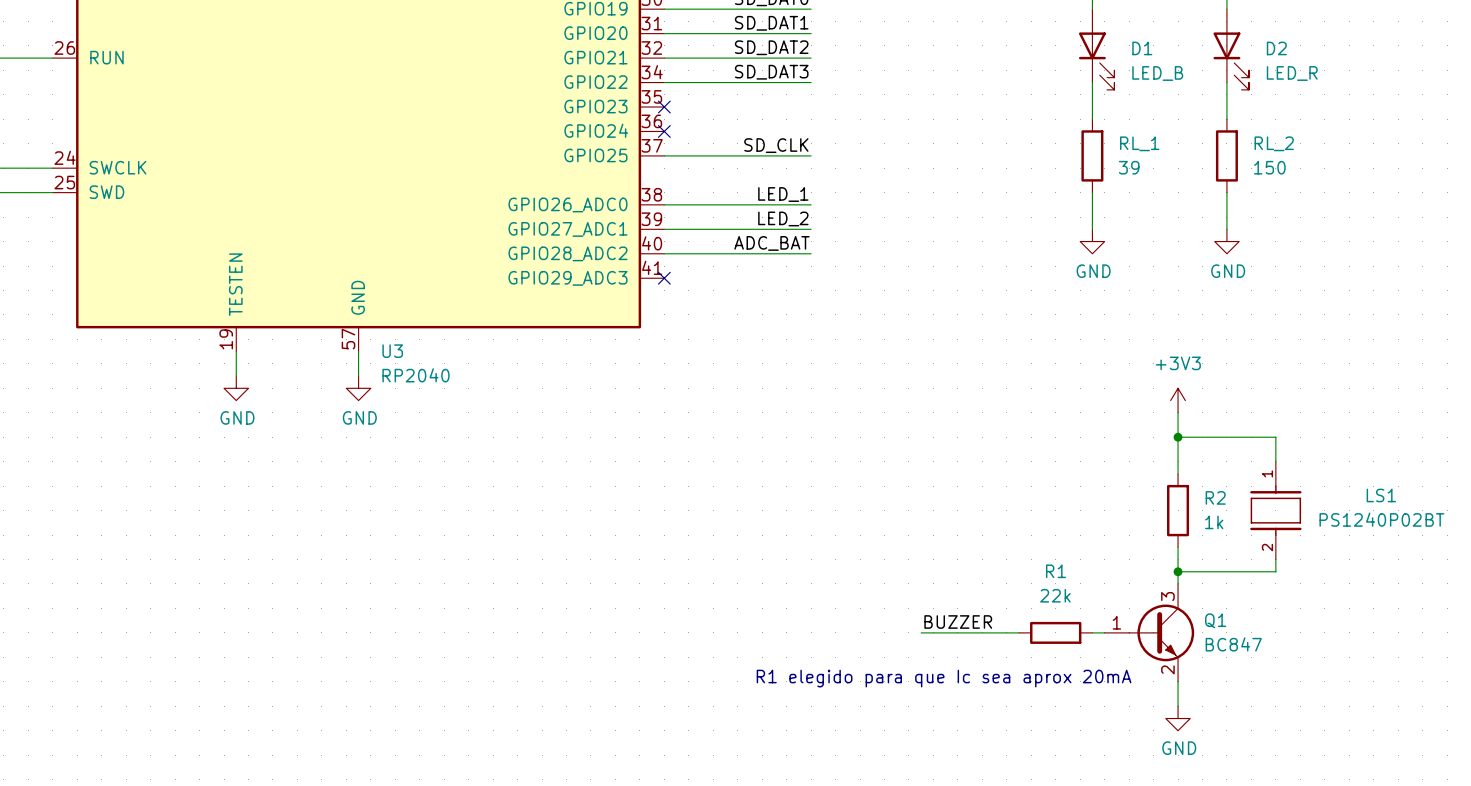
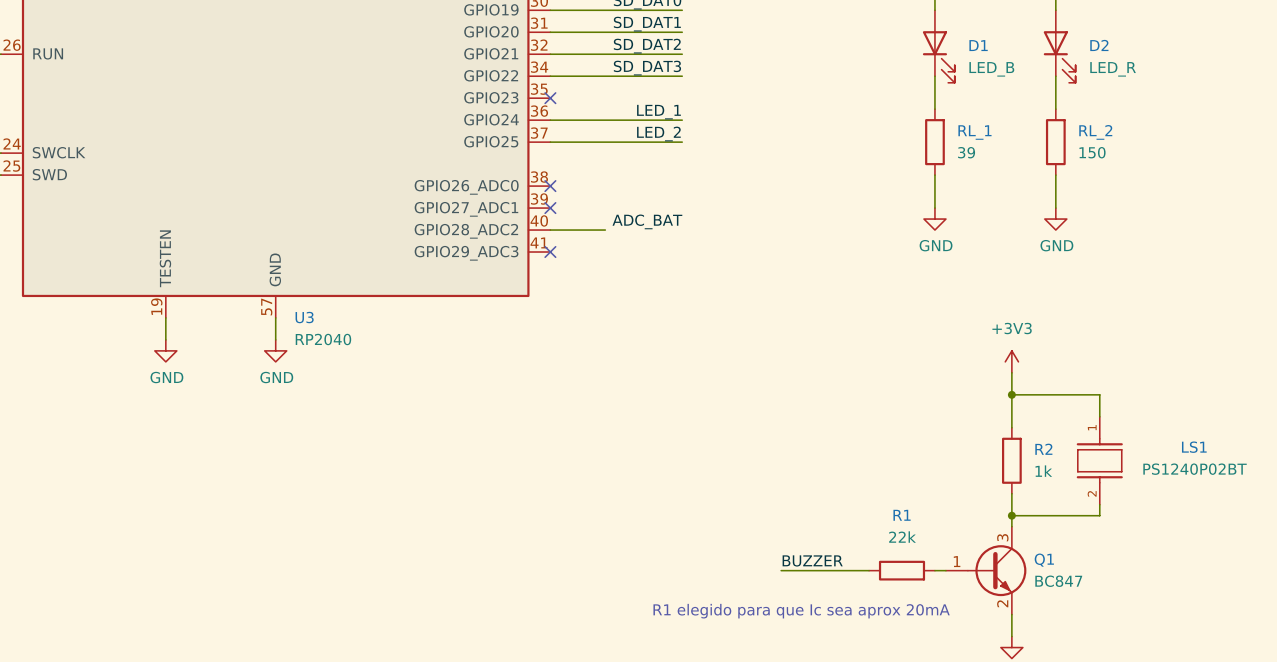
no-connect mark: (664, 131) -> none
label: SD_CLK (776, 145) -> LED_2 (658, 134)
label position: LED_1 (783, 194) -> LED_1 (658, 112)
wire: (664, 204) (811, 204) -> (550, 120) (682, 120)
no-connect mark: none -> (550, 186)
label: LED_2 (783, 218) -> none
wire: (664, 229) (811, 229) -> none
no-connect mark: none -> (550, 208)
wire: (725, 253) (811, 253) -> none

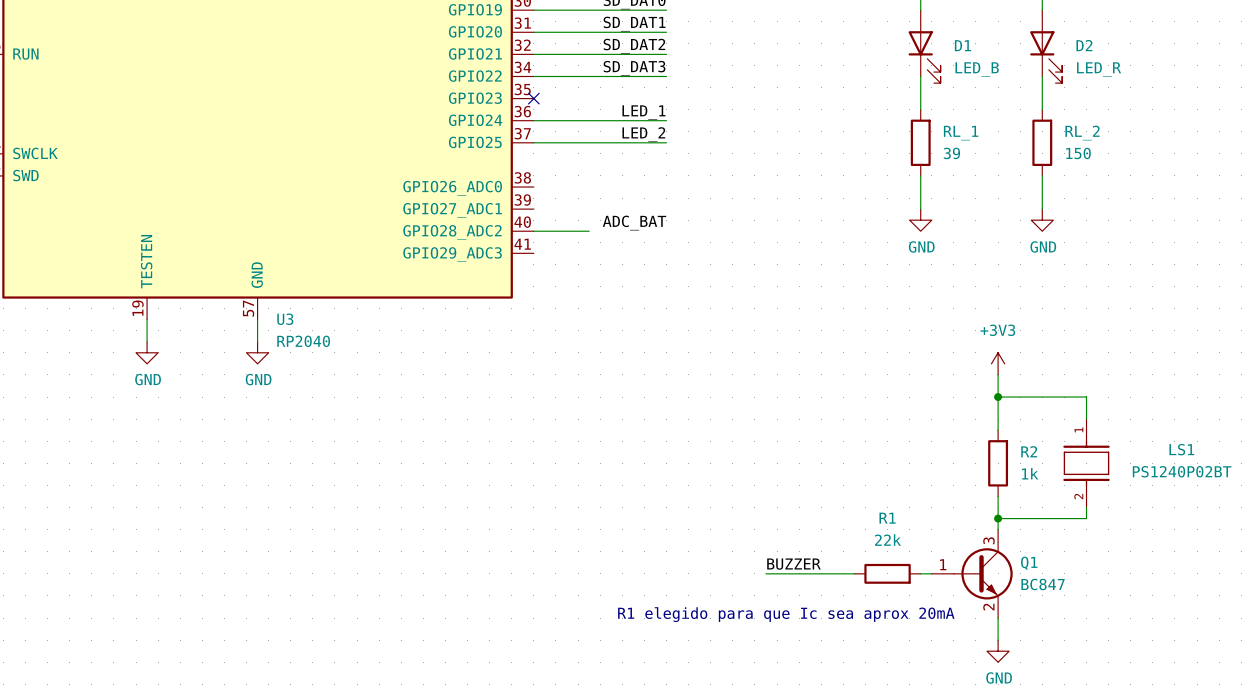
no-connect mark: (550, 186) -> none
no-connect mark: (550, 208) -> none
no-connect mark: (550, 252) -> none

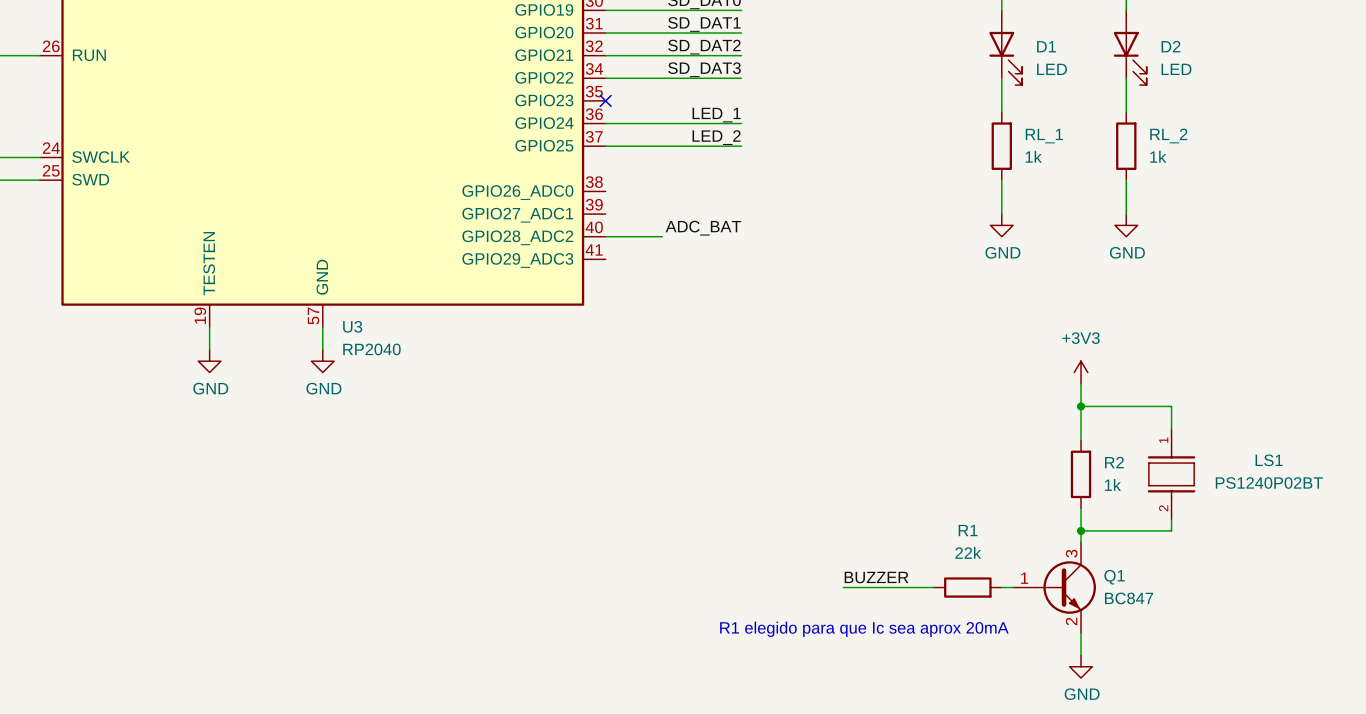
D1 value: LED_B (977, 69) -> LED (1052, 69)
D2 value: LED_R (1099, 69) -> LED (1176, 69)
RL_1 value: 39 (951, 153) -> 1k (1033, 156)
RL_2 value: 150 (1078, 153) -> 1k (1158, 156)

